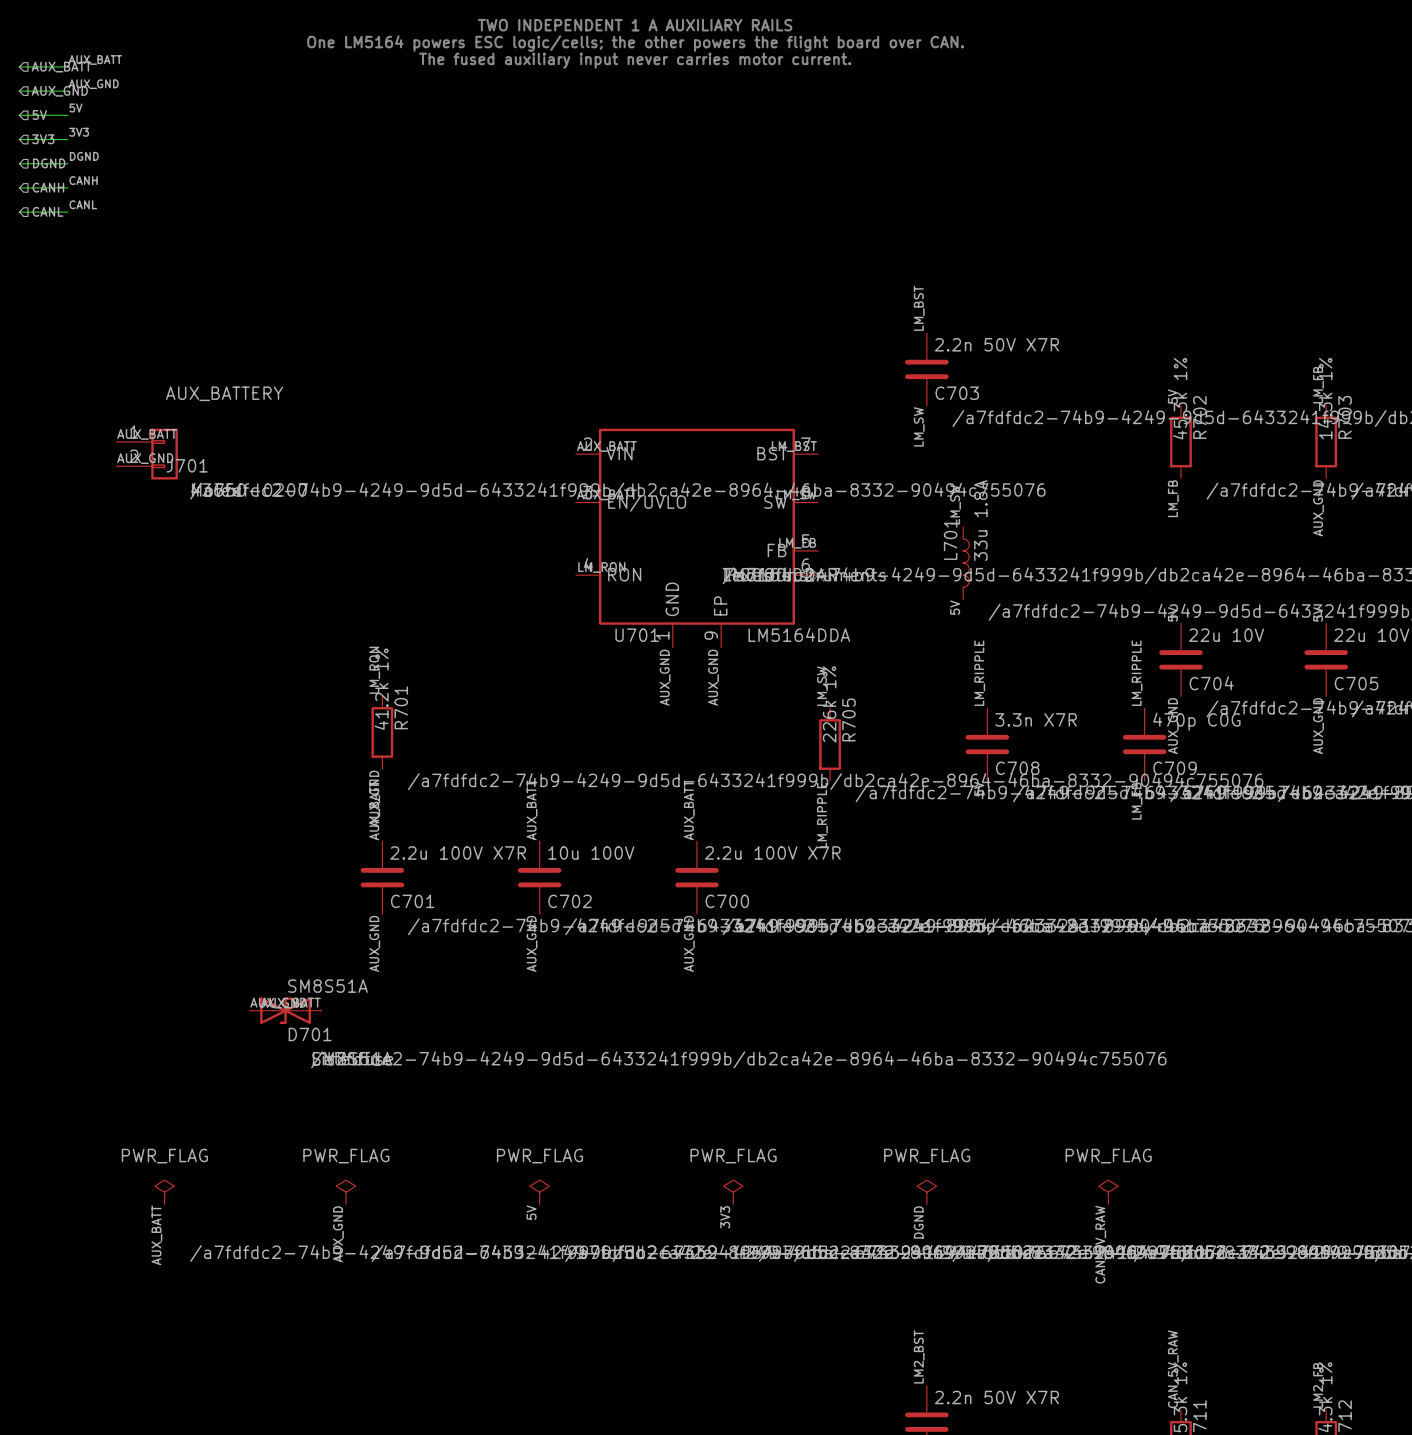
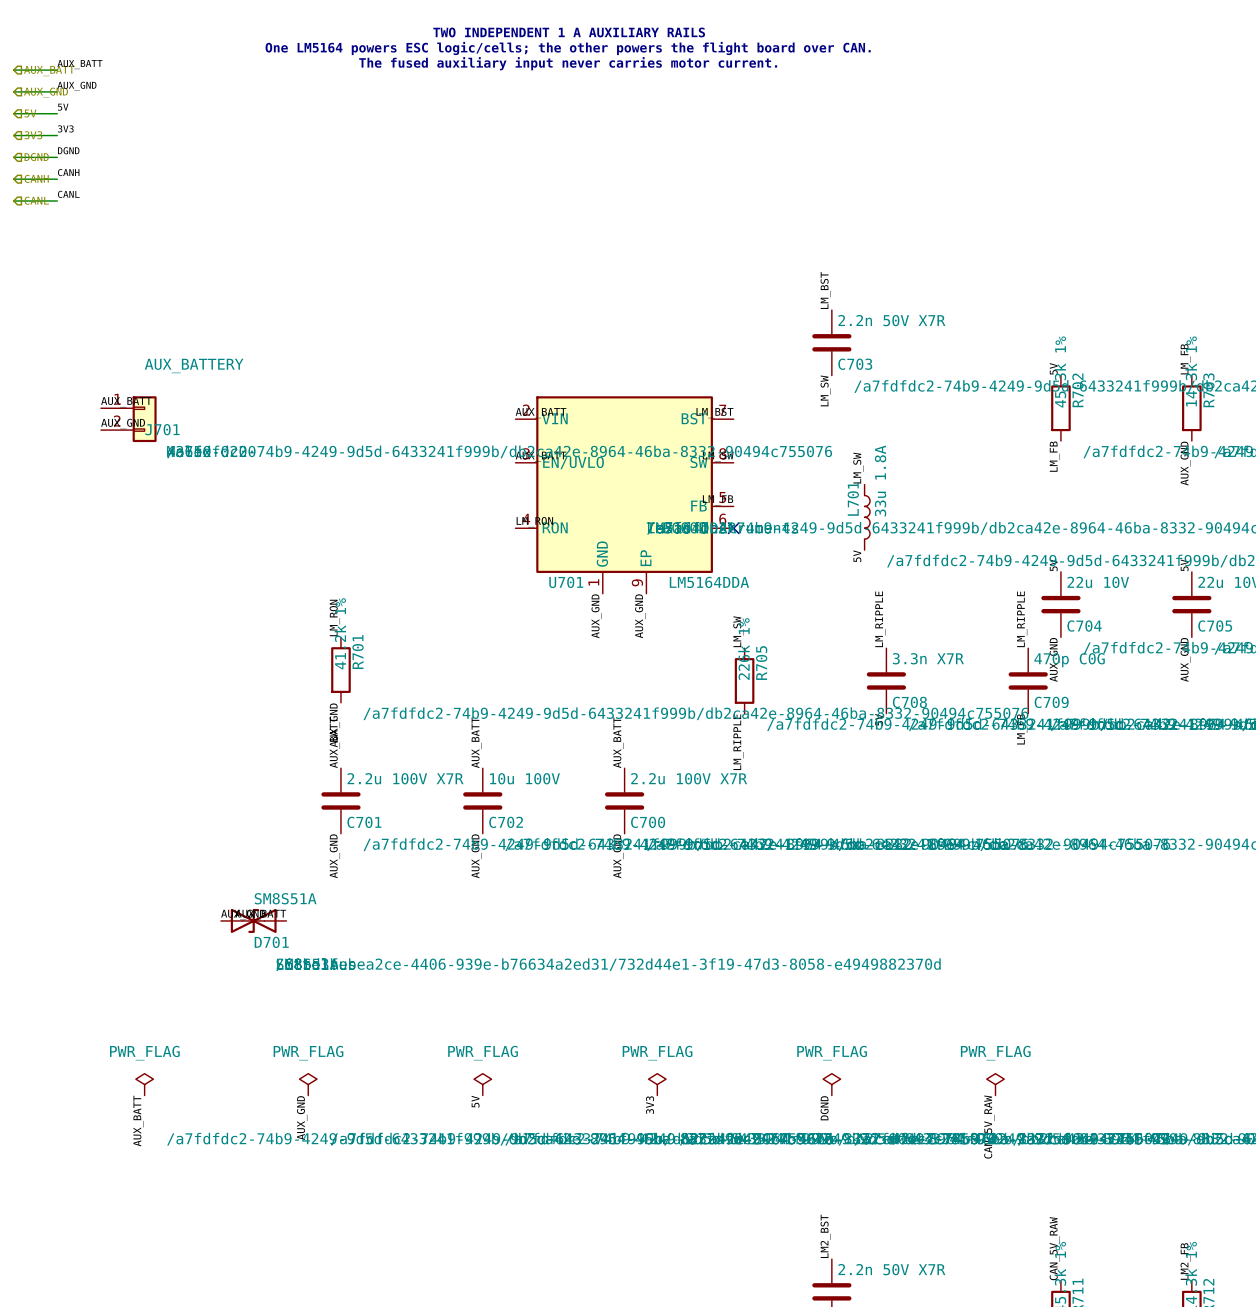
D701 text: /a7fdfdc2-74b9-4249-9d5d-6433241f999b/db2ca42e-8964-46ba-8332-90494c755076 (738, 1059) -> /68bd3beb-a2ce-4406-939e-b76634a2ed31/732d44e1-3f19-47d3-8058-e4949882370d (608, 964)

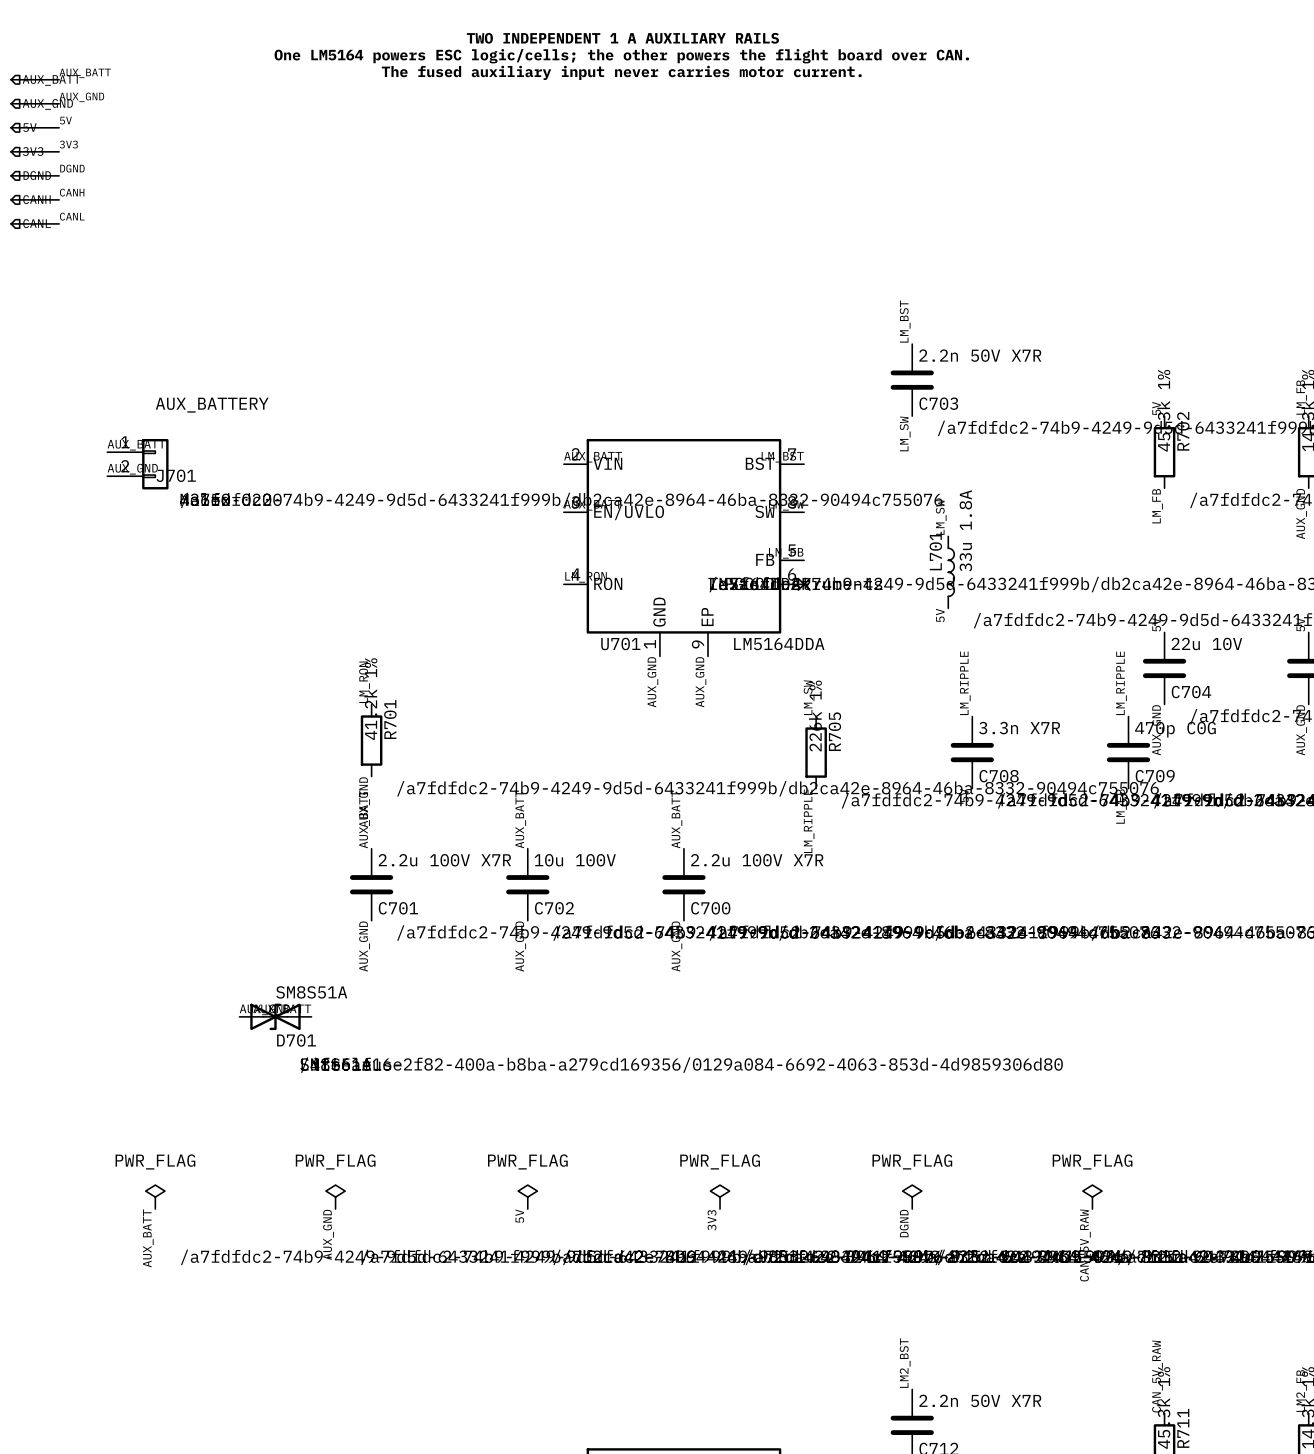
D701 text: /68bd3beb-a2ce-4406-939e-b76634a2ed31/732d44e1-3f19-47d3-8058-e4949882370d (608, 964) -> /4fe6ae16-2f82-400a-b8ba-a279cd169356/0129a084-6692-4063-853d-4d9859306d80 (681, 1065)

